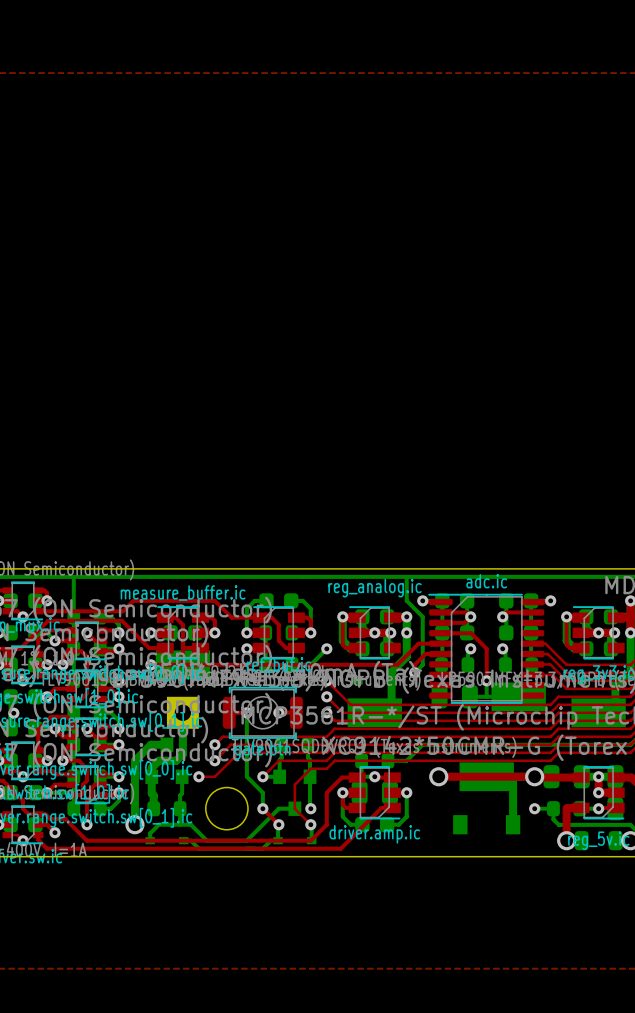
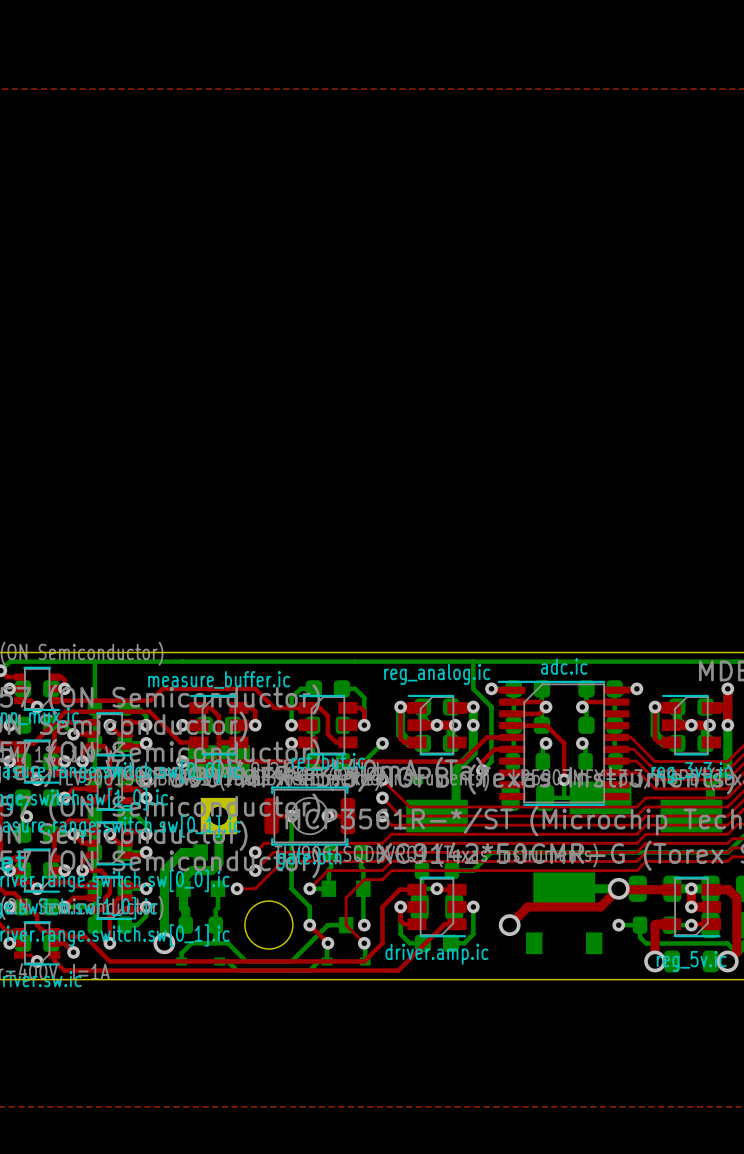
top track: (438, 776) (534, 776) -> (509, 925) (527, 906) (600, 906) (618, 888)
via position: (438, 776) -> (509, 925)
bottom track: (513, 776) (513, 824) -> none

